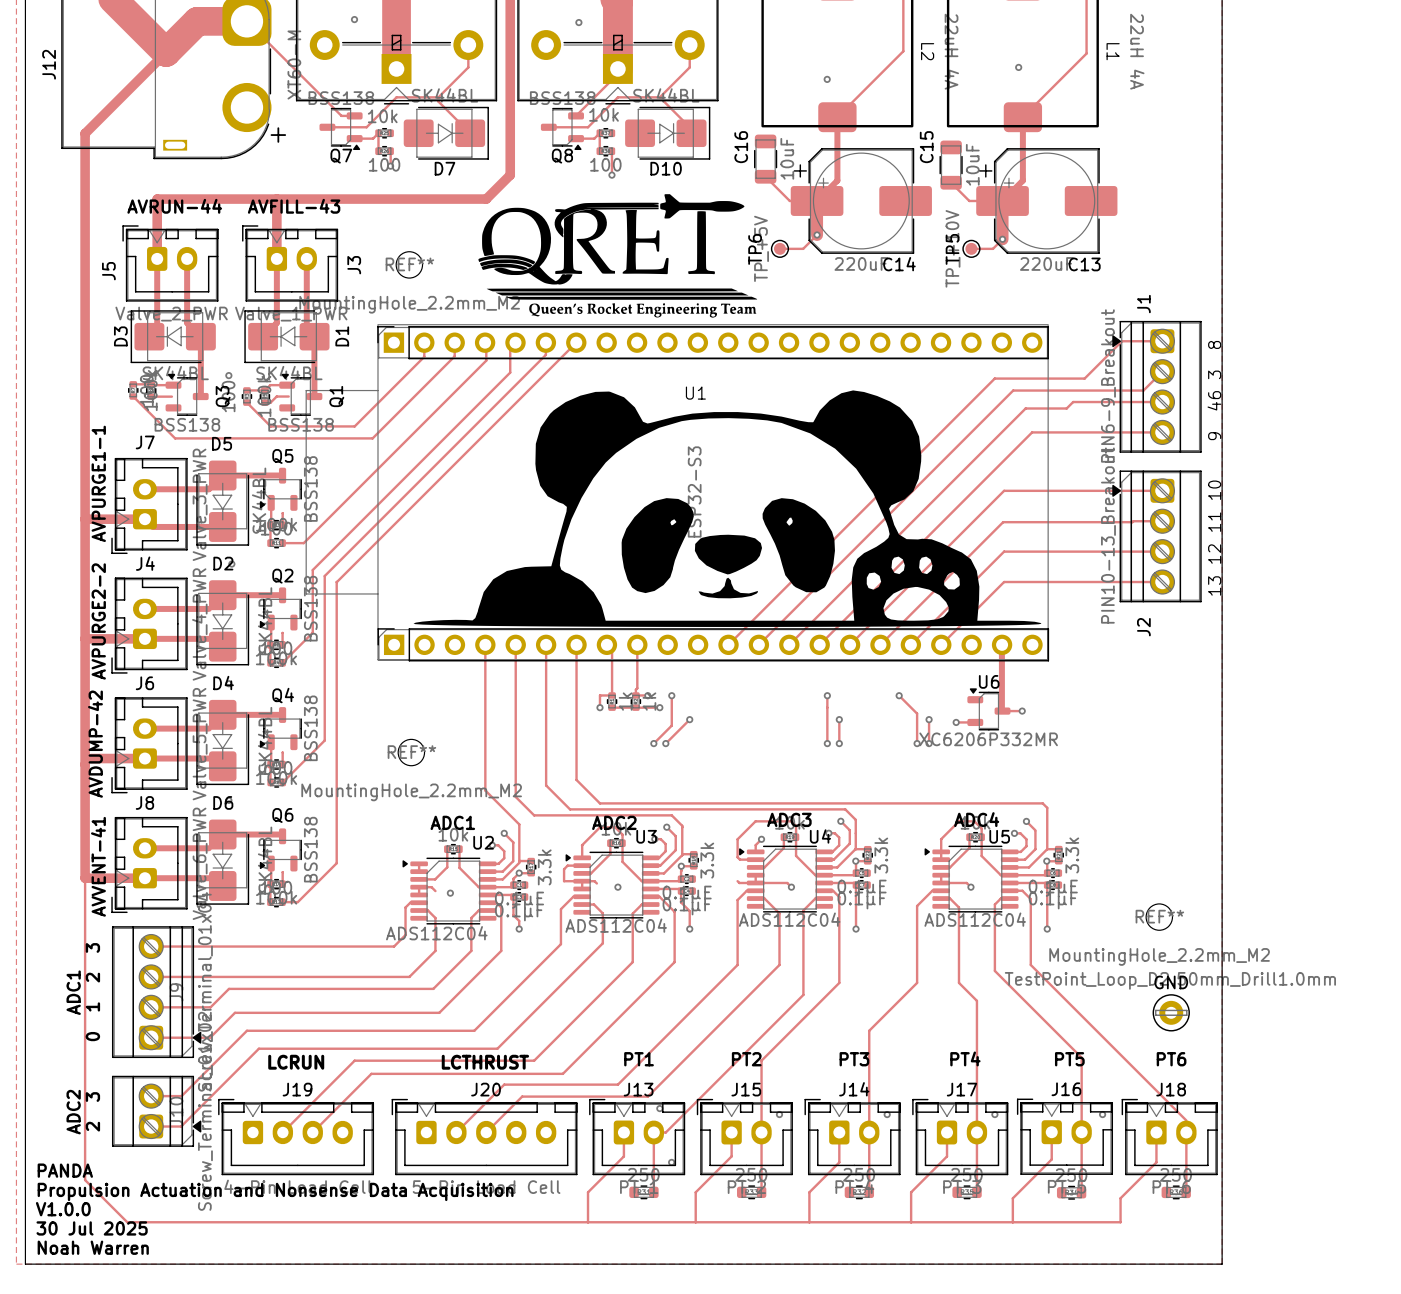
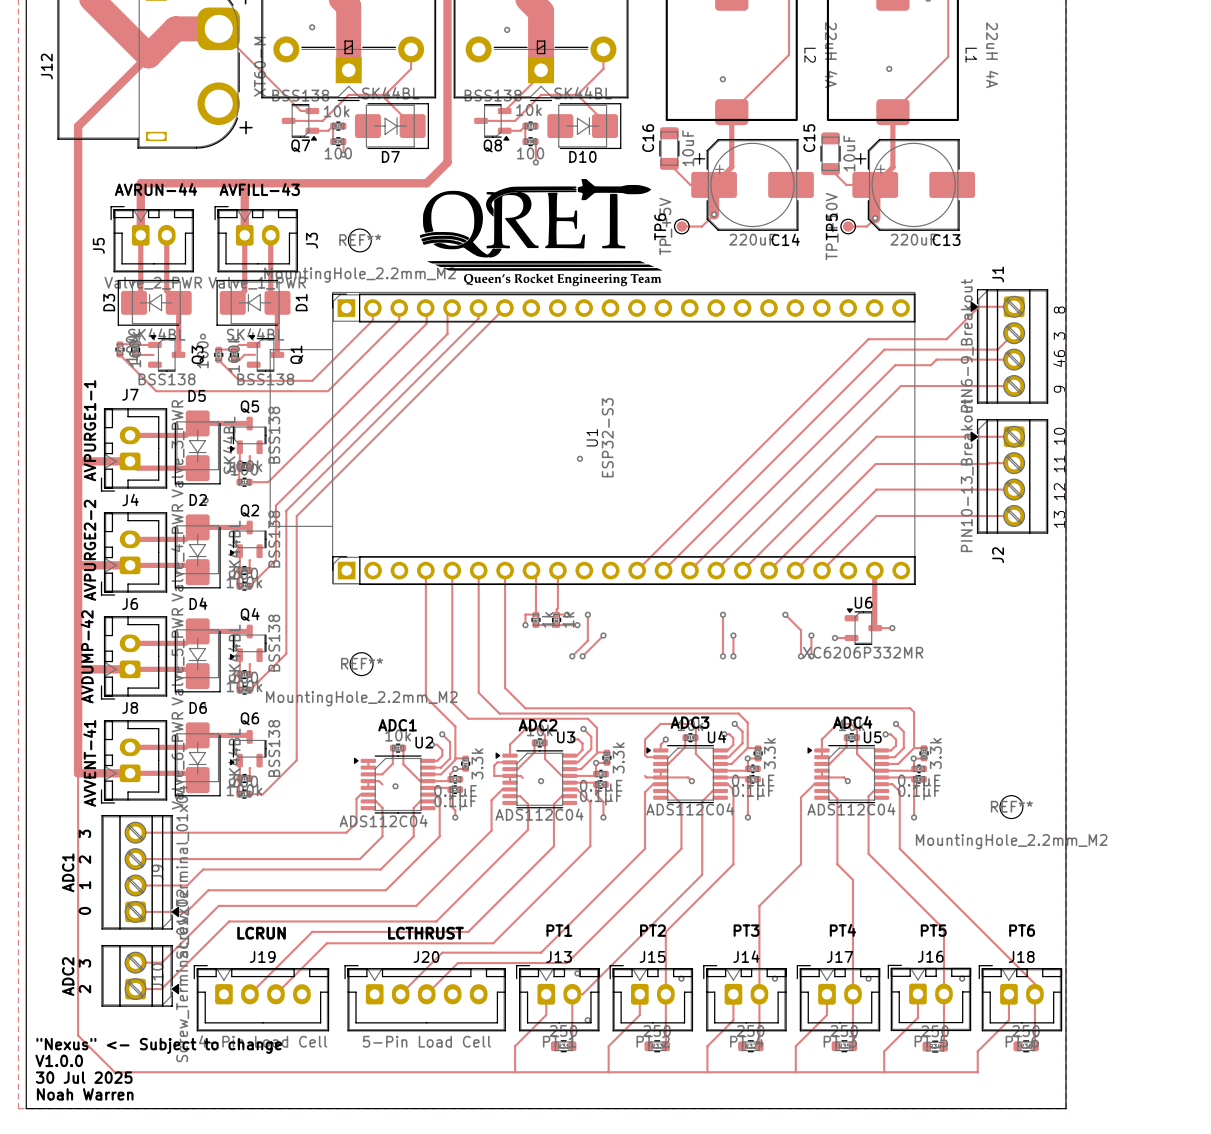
drawing: [413, 390, 1042, 627] -> none
U1 name rotation: 0° (695, 393) -> 90° counterclockwise (592, 437)
U1 name position: U1 (695, 393) -> U1 (592, 437)
GND: TestPoint_Loop_D2.50mm_Drill1.0mm (1171, 1012) -> none
text: PANDA (65, 1170) -> none
text: Propulsion Actuation and Nonsense Data Acquisition (275, 1191) -> "Nexus" <- Subject to change (159, 1045)

